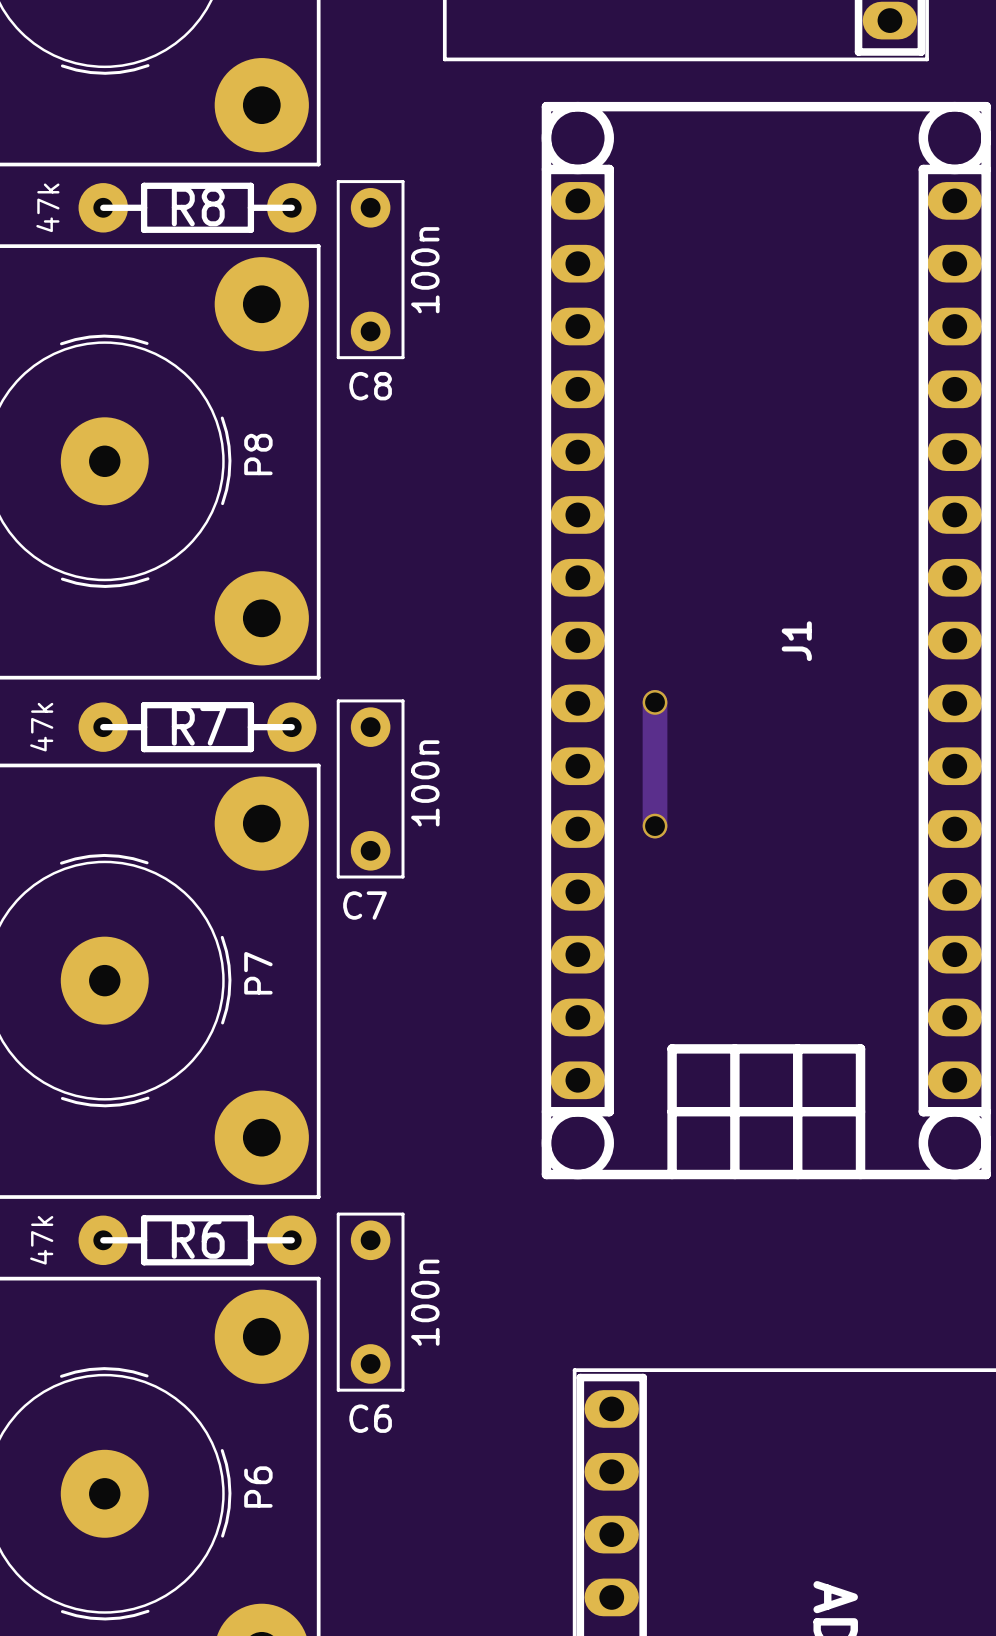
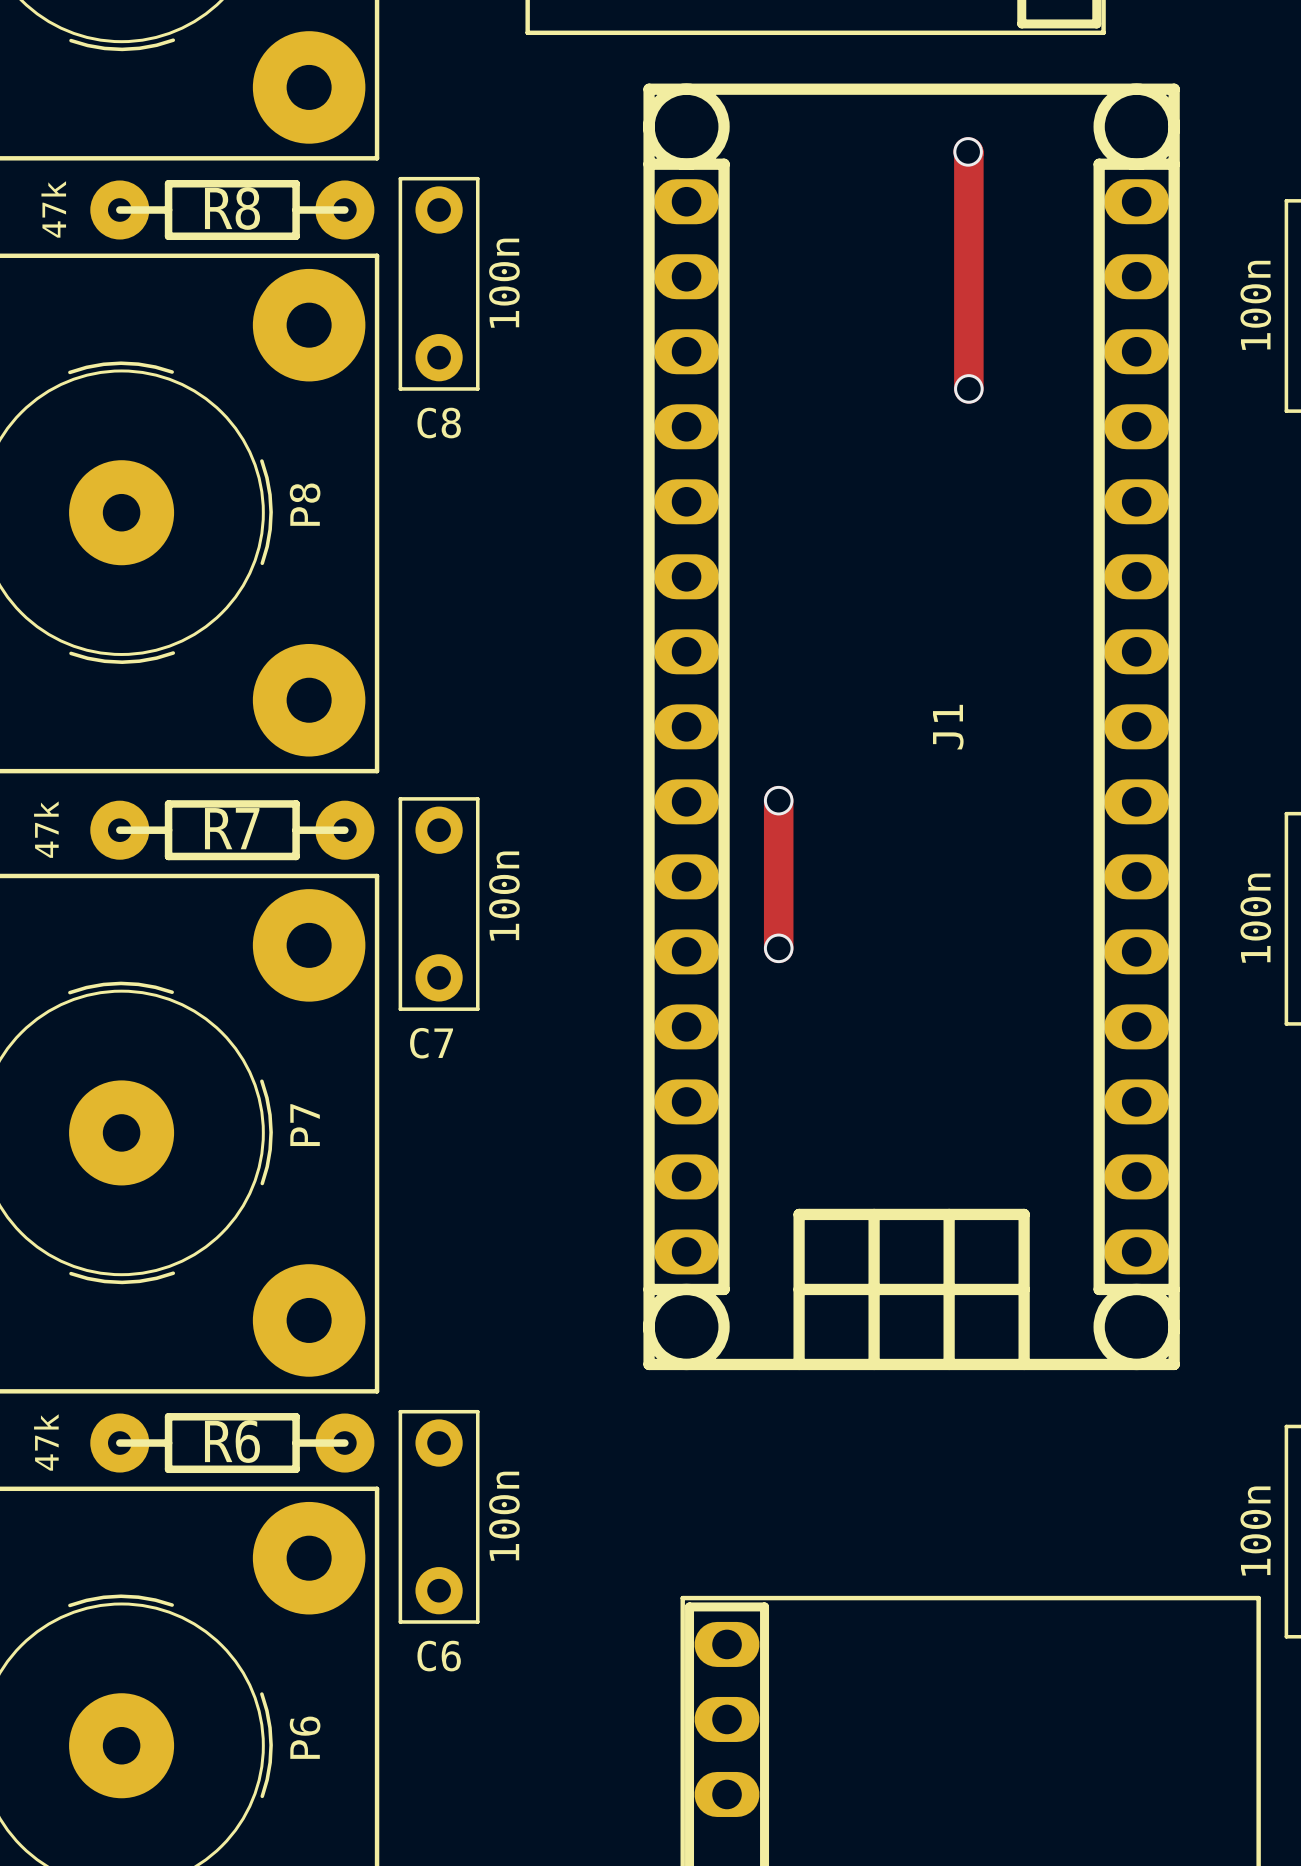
track: none -> (968, 151) (968, 388)
via: none -> (968, 151)
via: none -> (968, 388)

